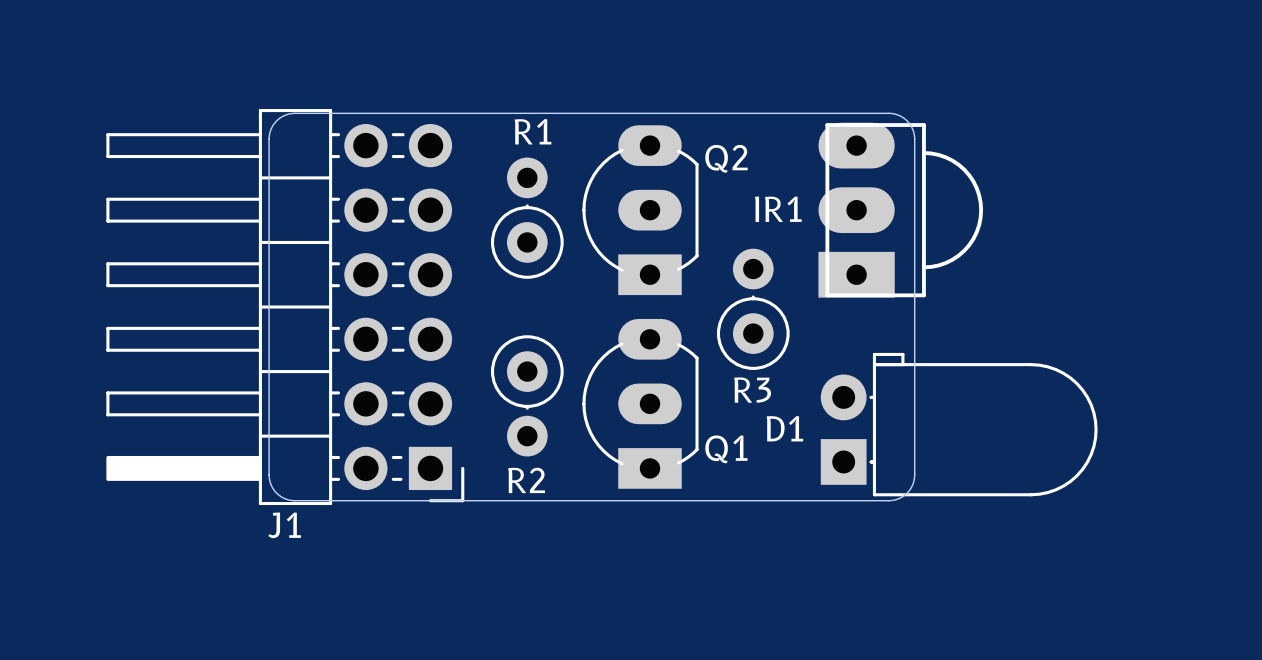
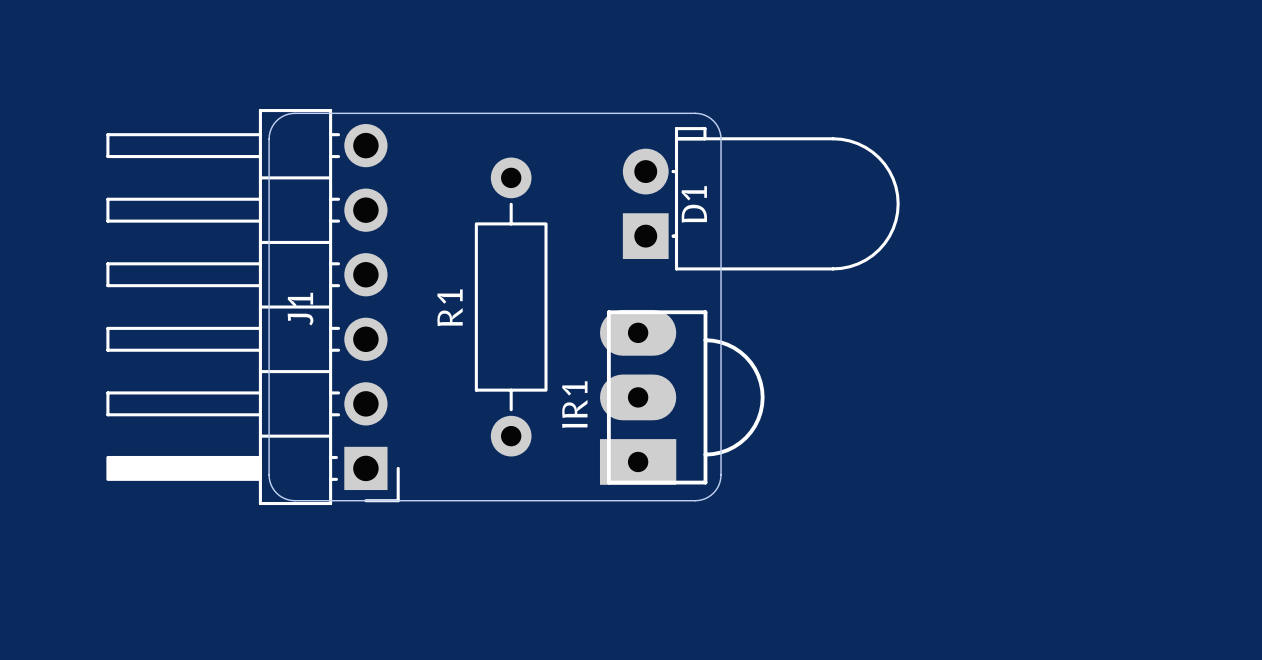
J1 footprint: [106, 109, 465, 506] -> [106, 109, 400, 506]
board edge: (695, 113) (892, 113) (907, 120) (912, 129) (914, 139) (914, 474) (911, 487) (901, 497) (888, 500) (695, 500) -> (695, 113) (705, 115) (713, 120) (719, 129) (721, 139) (720, 478) (717, 487) (710, 495) (695, 500)
R1 name position: R1 (532, 131) -> R1 (449, 307)
R1 footprint: [490, 157, 564, 279] -> [474, 157, 548, 457]
IR1 name rotation: 0° (778, 209) -> 90° counterclockwise (574, 404)
Q2: (640, 210) -> none
IR1 position: (900, 210) -> (682, 397)
R3: (753, 309) -> none
R2: (527, 395) -> none
Q1: (640, 403) -> none
D1 position: (959, 424) -> (761, 198)
D1 name rotation: 0° (784, 428) -> 90° counterclockwise (694, 204)
D1 name position: D1 (784, 428) -> D1 (694, 204)
J1 name position: J1 (284, 525) -> J1 (300, 309)

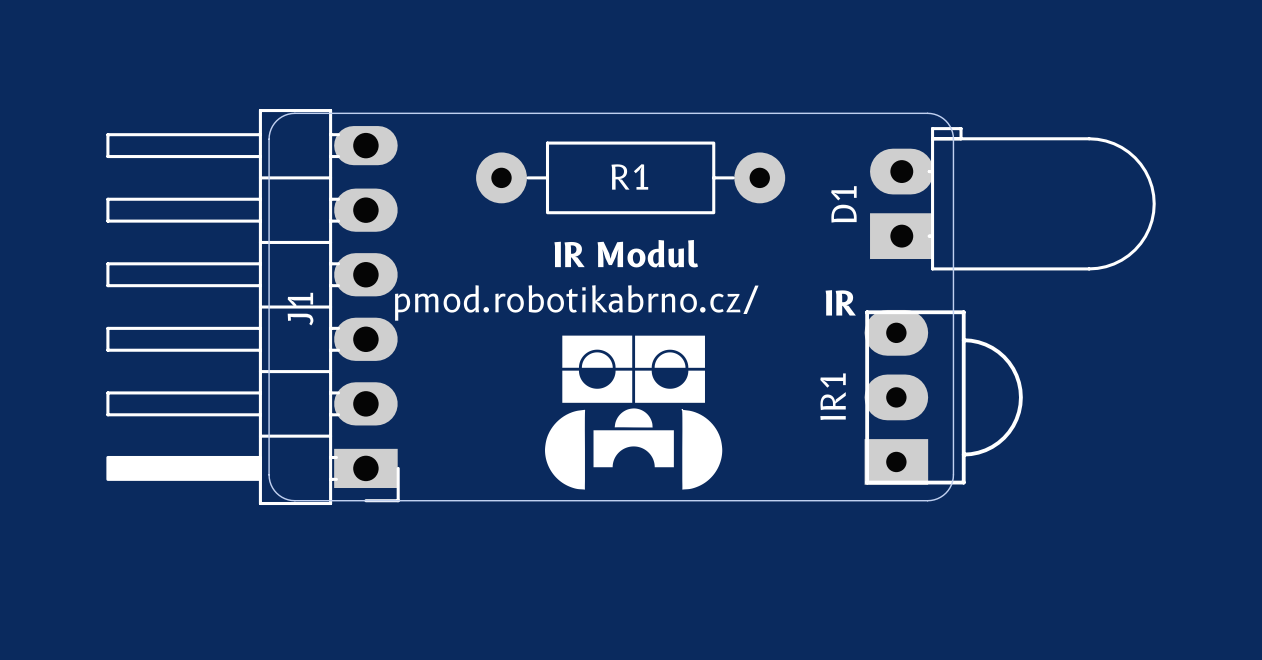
J1 footprint: [106, 109, 400, 506] -> [106, 109, 400, 506]
board edge: (695, 113) (705, 115) (713, 120) (719, 129) (721, 139) (720, 478) (717, 487) (710, 495) (695, 500) -> (695, 113) (930, 113) (940, 116) (948, 123) (953, 139) (953, 474) (948, 490) (940, 497) (927, 500) (695, 500)
D1 footprint: [622, 127, 900, 271] -> [870, 127, 1156, 271]
R1 footprint: [474, 157, 548, 457] -> [476, 141, 786, 215]
D1 name position: D1 (694, 204) -> D1 (843, 204)
text: none -> IR Modul (626, 253)
text: none -> pmod.robotikabrno.cz/ (576, 302)
text: none -> IR (840, 302)
R1 name position: R1 (449, 307) -> R1 (629, 176)
IR1 footprint: [599, 309, 765, 485] -> [864, 309, 1023, 485]
drawing: none -> [545, 335, 723, 490]

